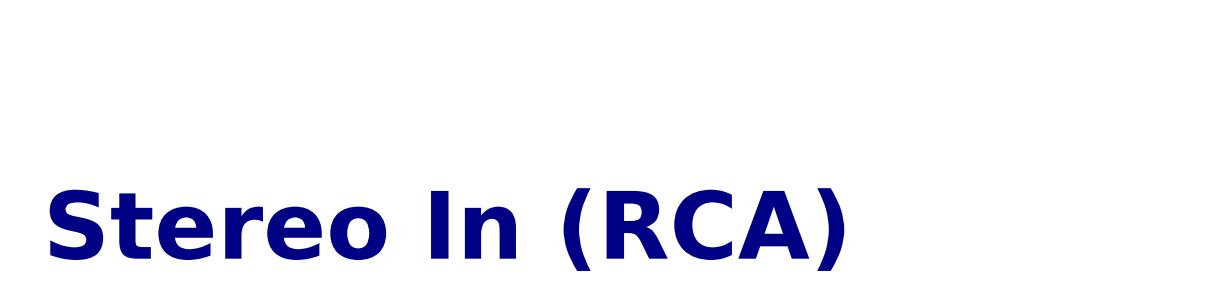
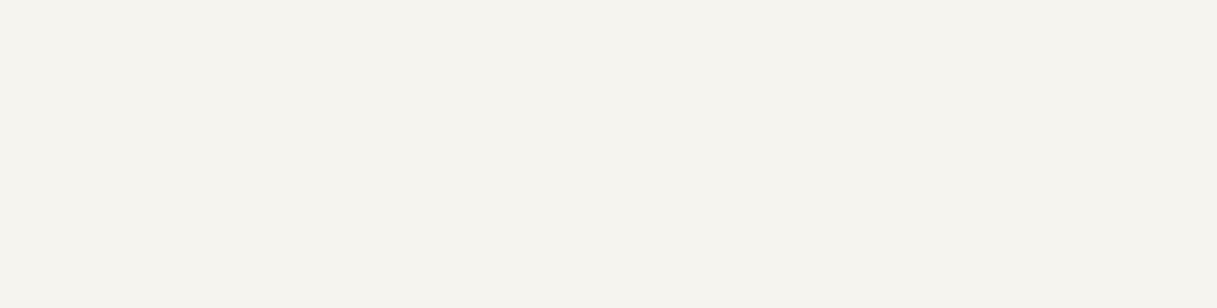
text: Stereo In (RCA) (446, 229) -> none

